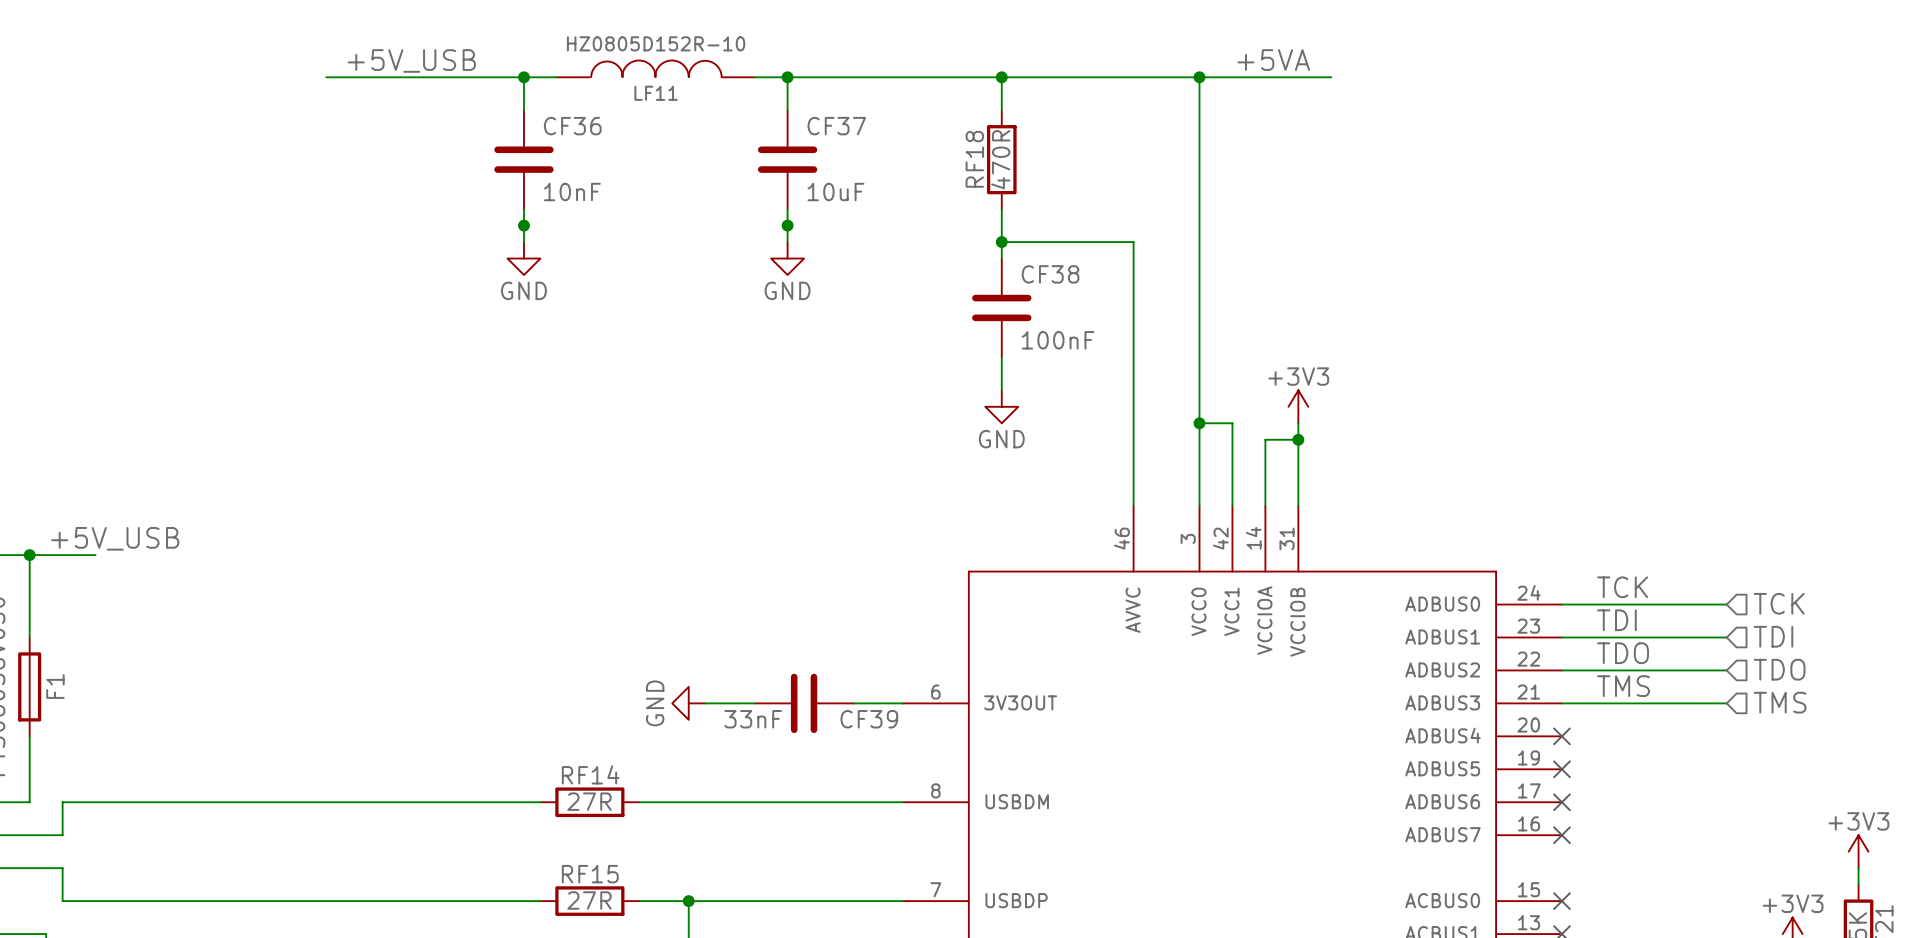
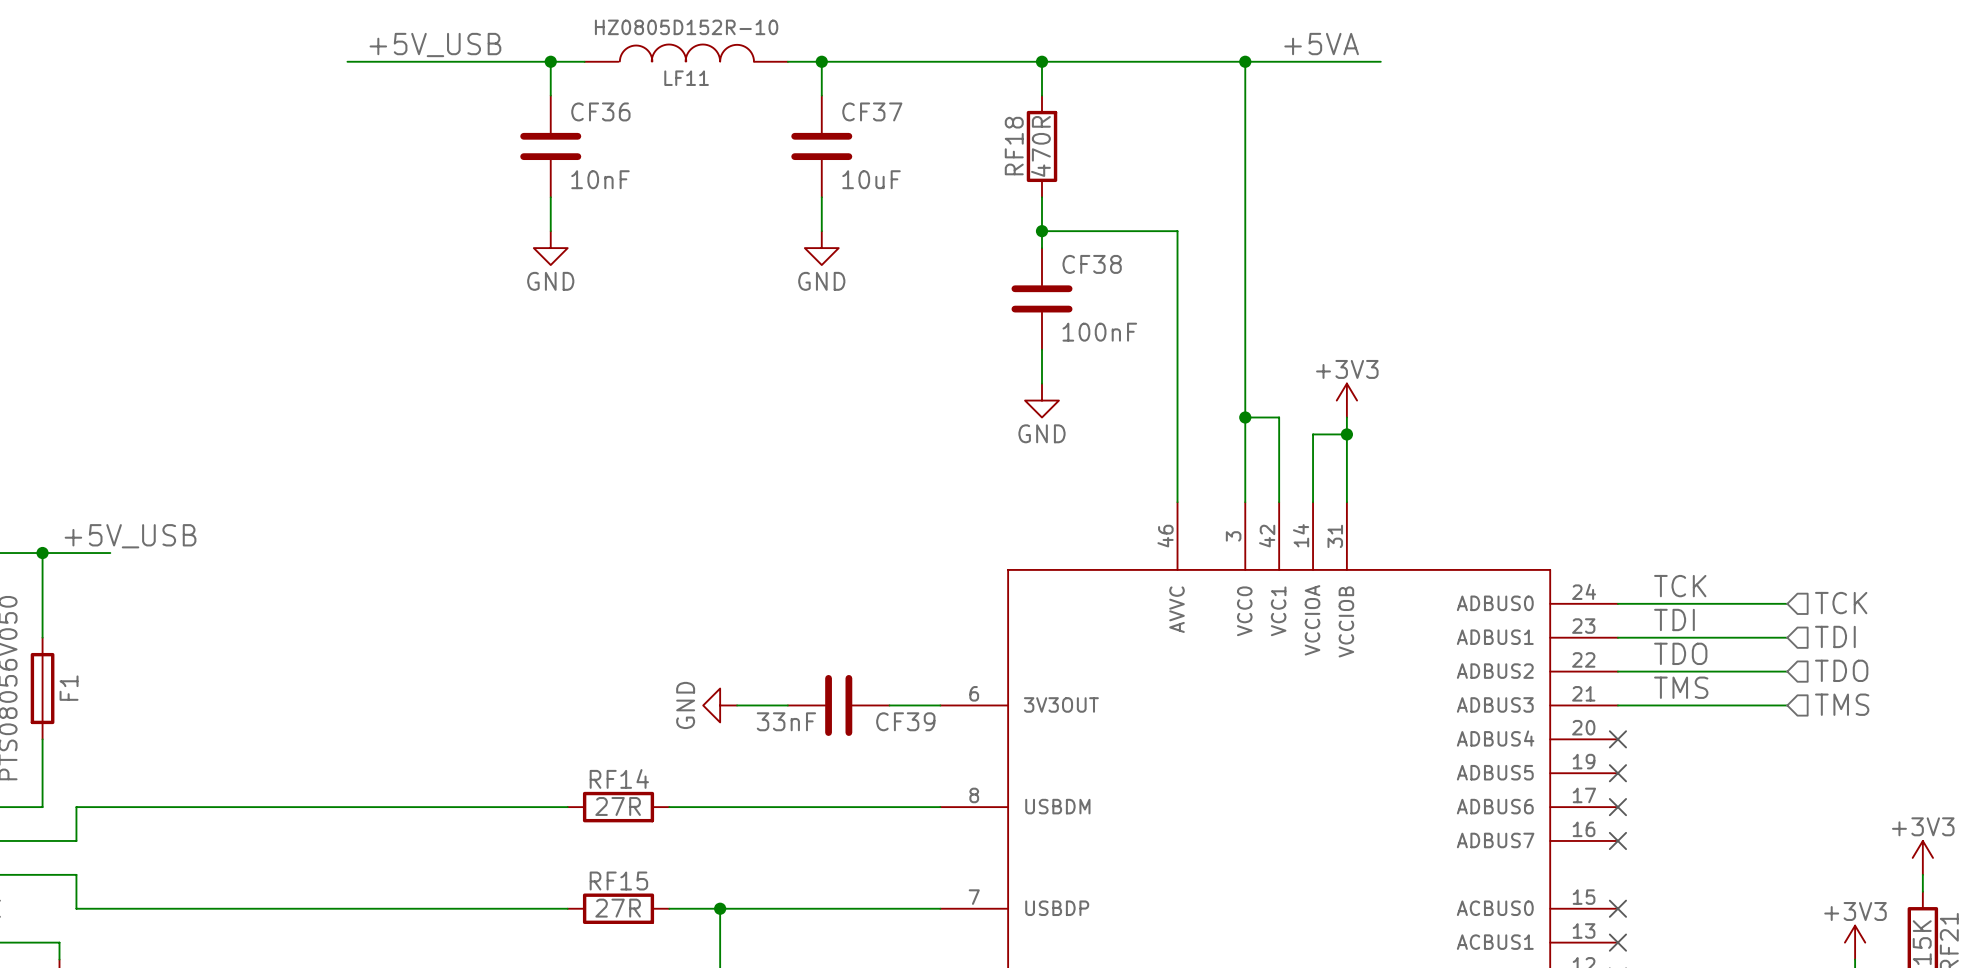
junction: (523, 225) -> none
junction: (787, 225) -> none

